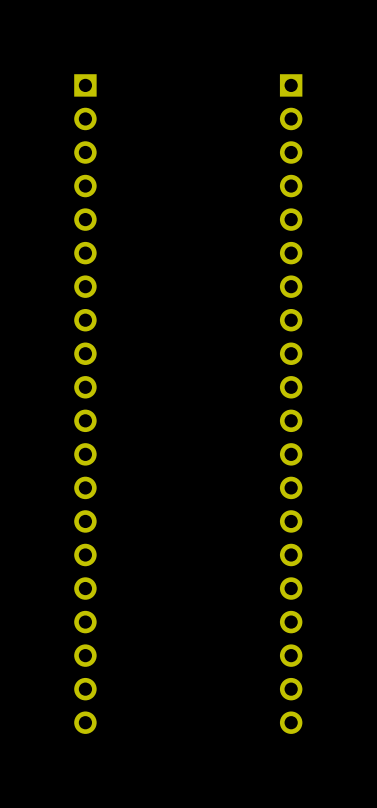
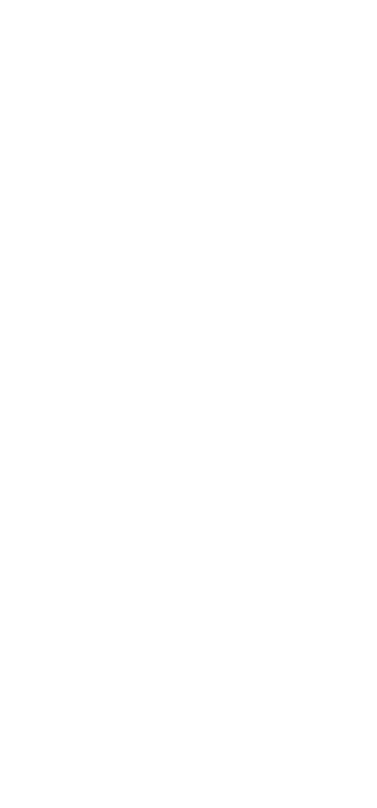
part: (85, 404) -> none
part: (291, 404) -> none

